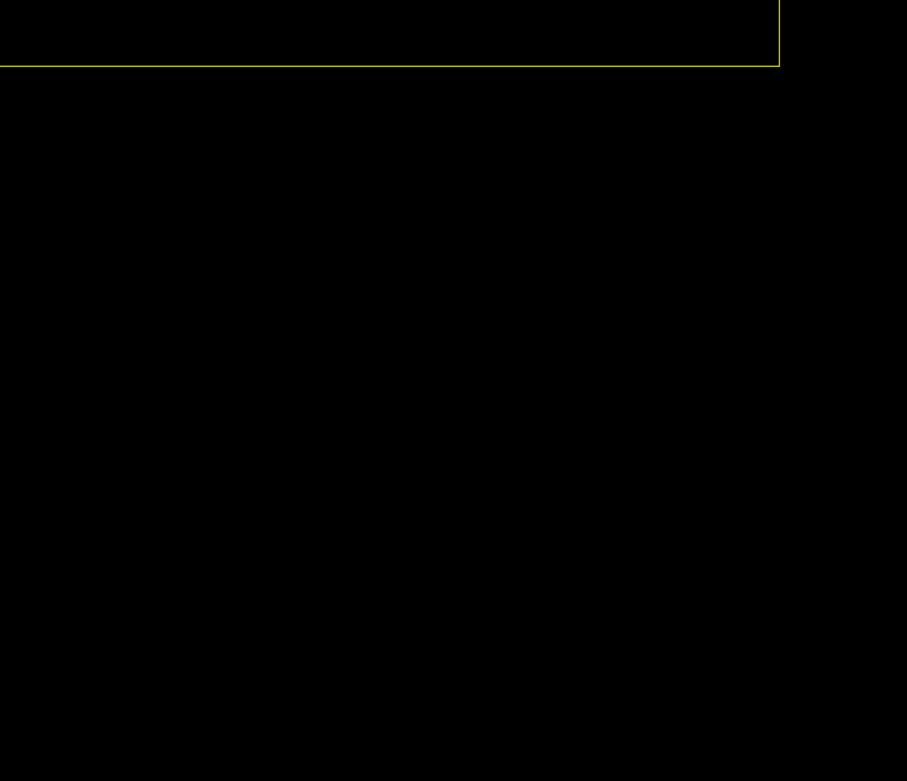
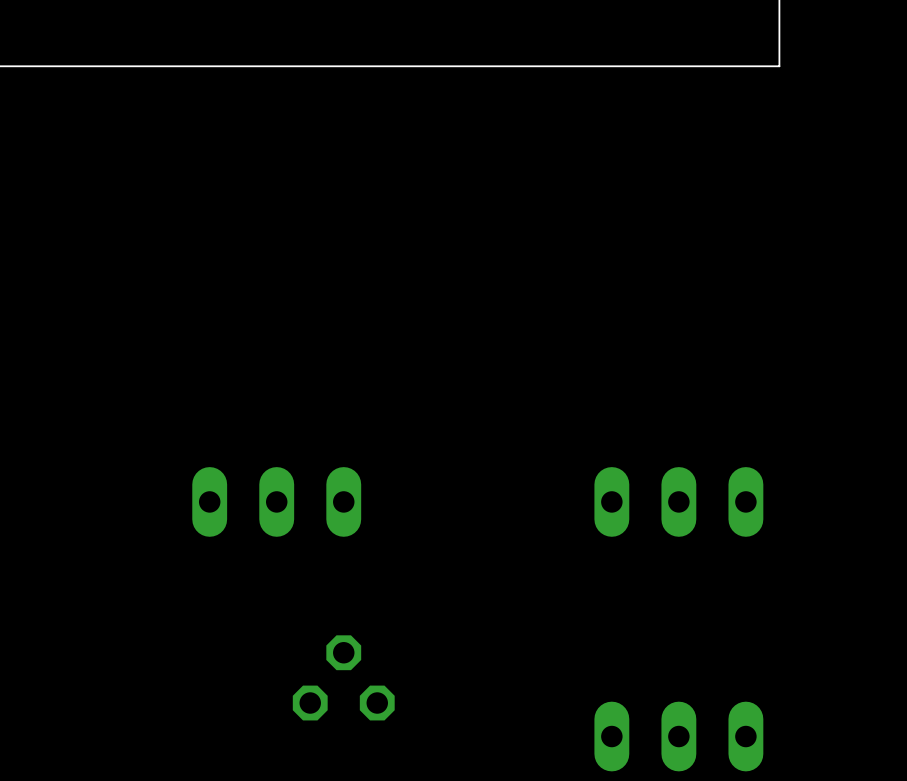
part: none -> (276, 501)
part: none -> (678, 501)
part: none -> (343, 677)
part: none -> (678, 736)

